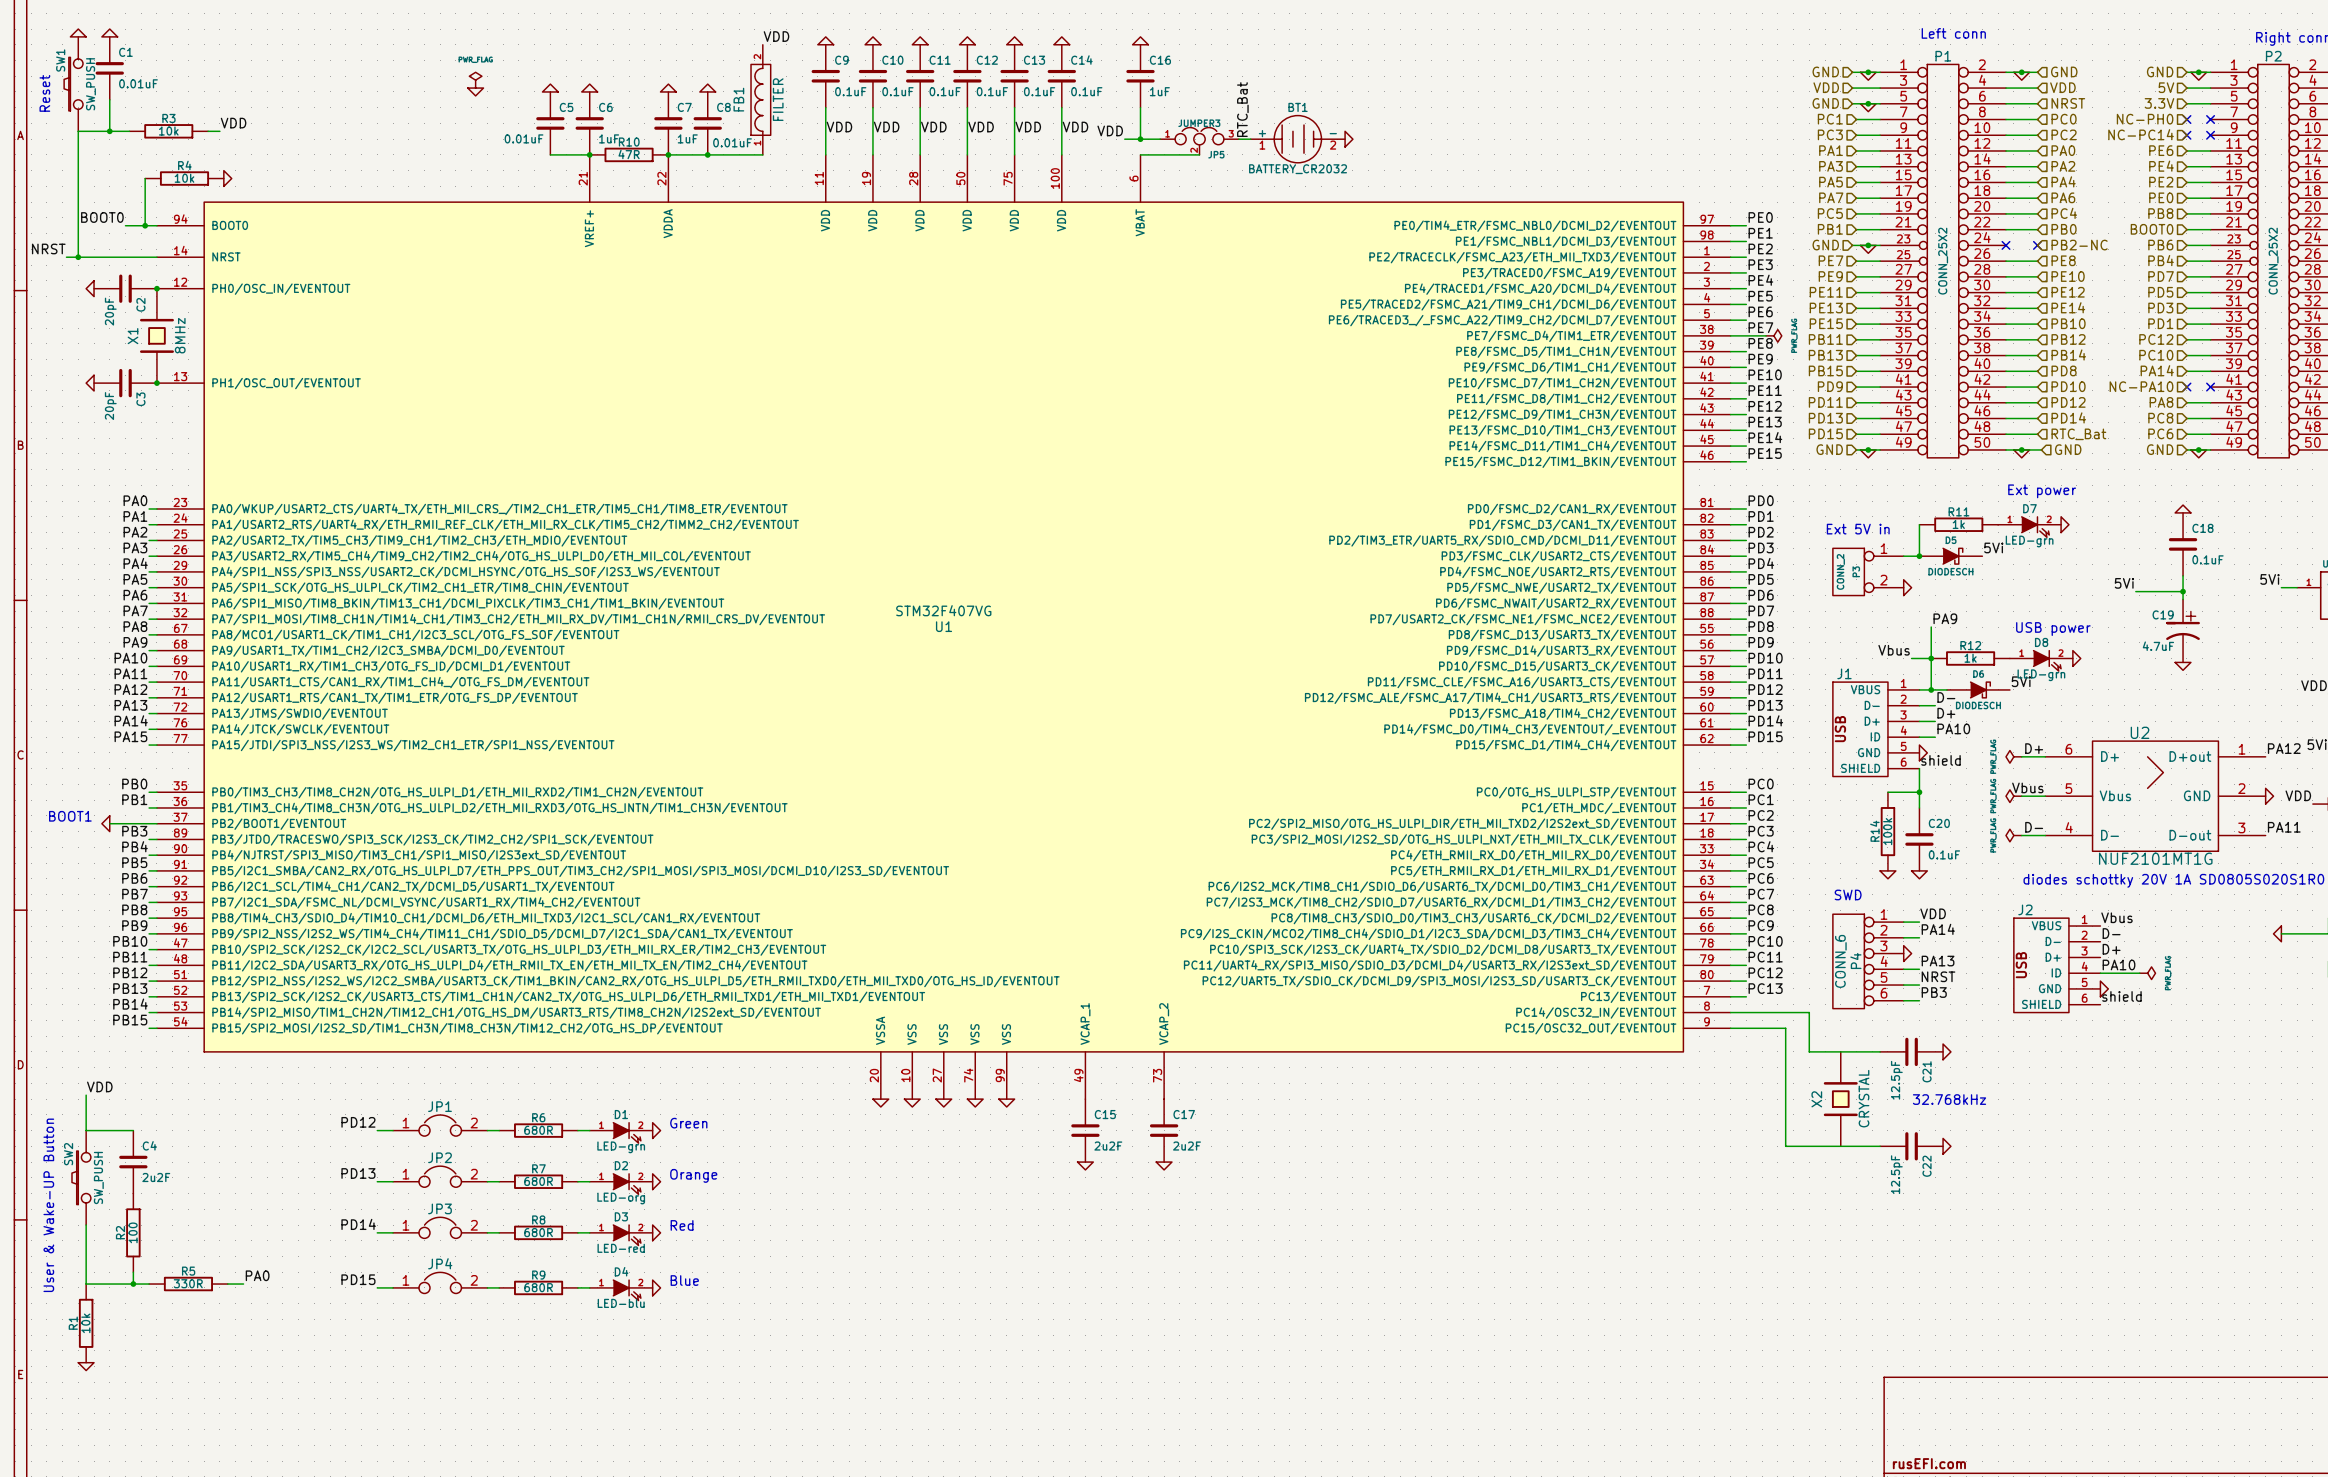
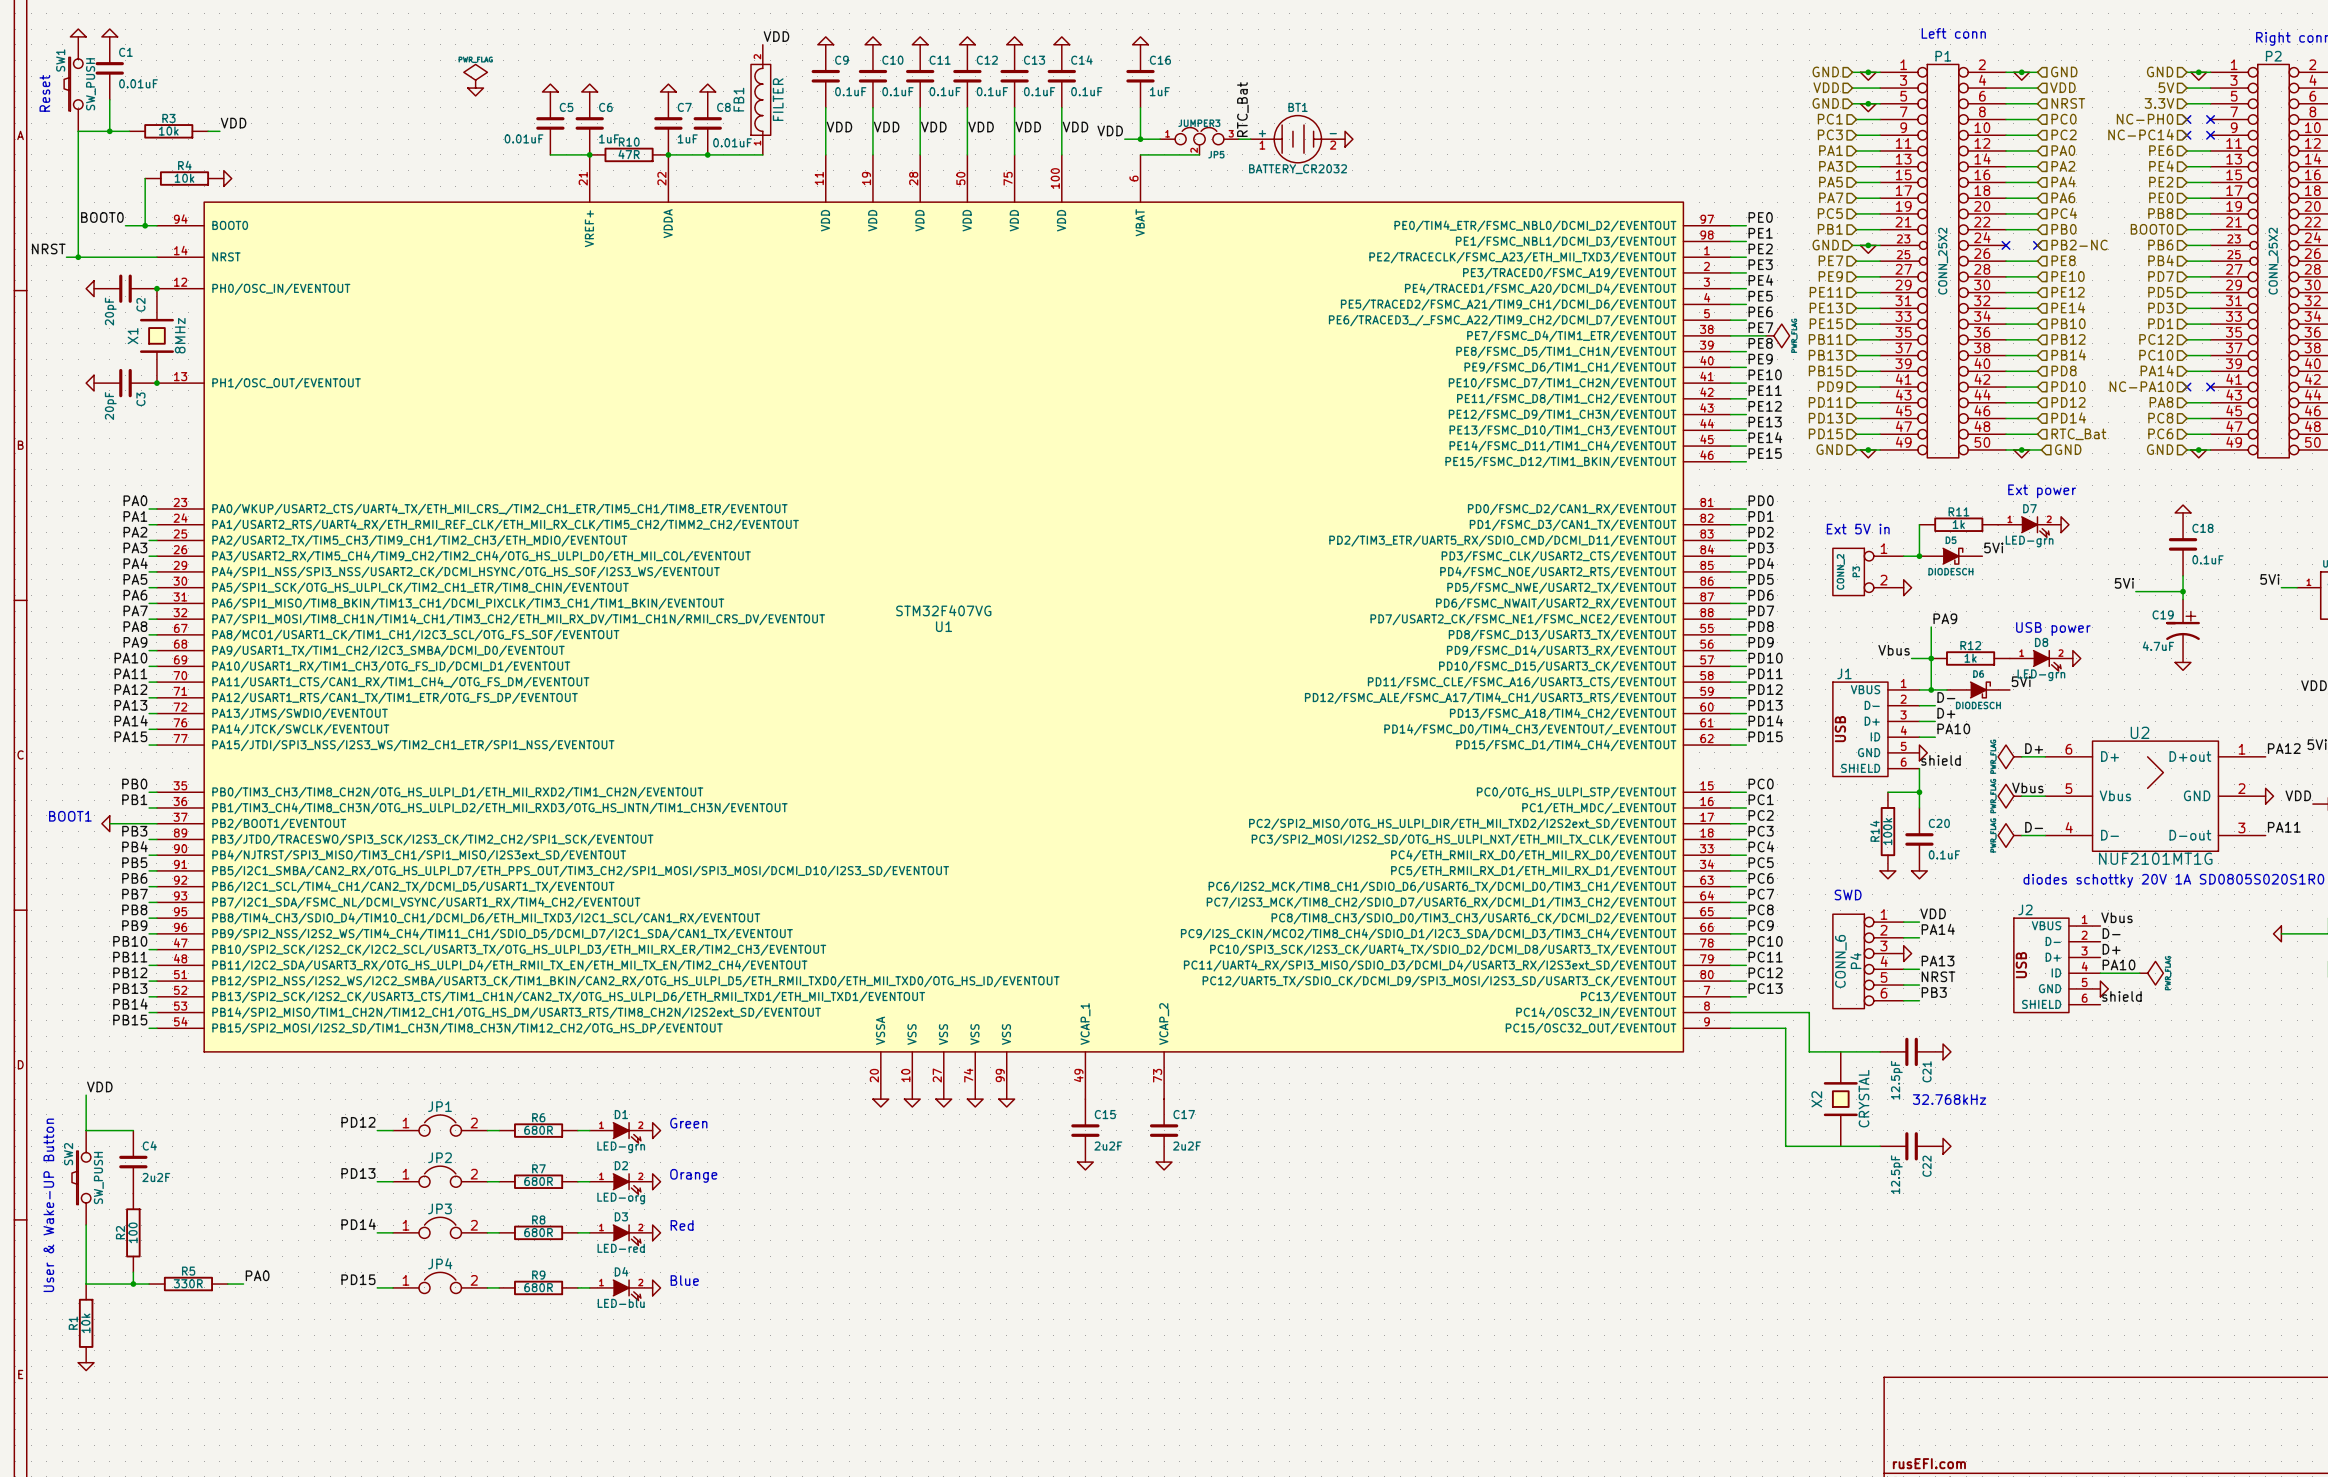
power symbol shape: [469, 72, 482, 89] -> [463, 64, 488, 89]
power symbol shape: [1766, 329, 1782, 343] -> [1766, 324, 1790, 348]
power symbol shape: [2005, 750, 2022, 764] -> [1998, 745, 2022, 769]
power symbol shape: [2005, 789, 2022, 803] -> [1998, 784, 2022, 808]
power symbol shape: [2005, 829, 2022, 842] -> [1998, 823, 2022, 848]
power symbol shape: [2139, 966, 2156, 980] -> [2139, 961, 2164, 986]

